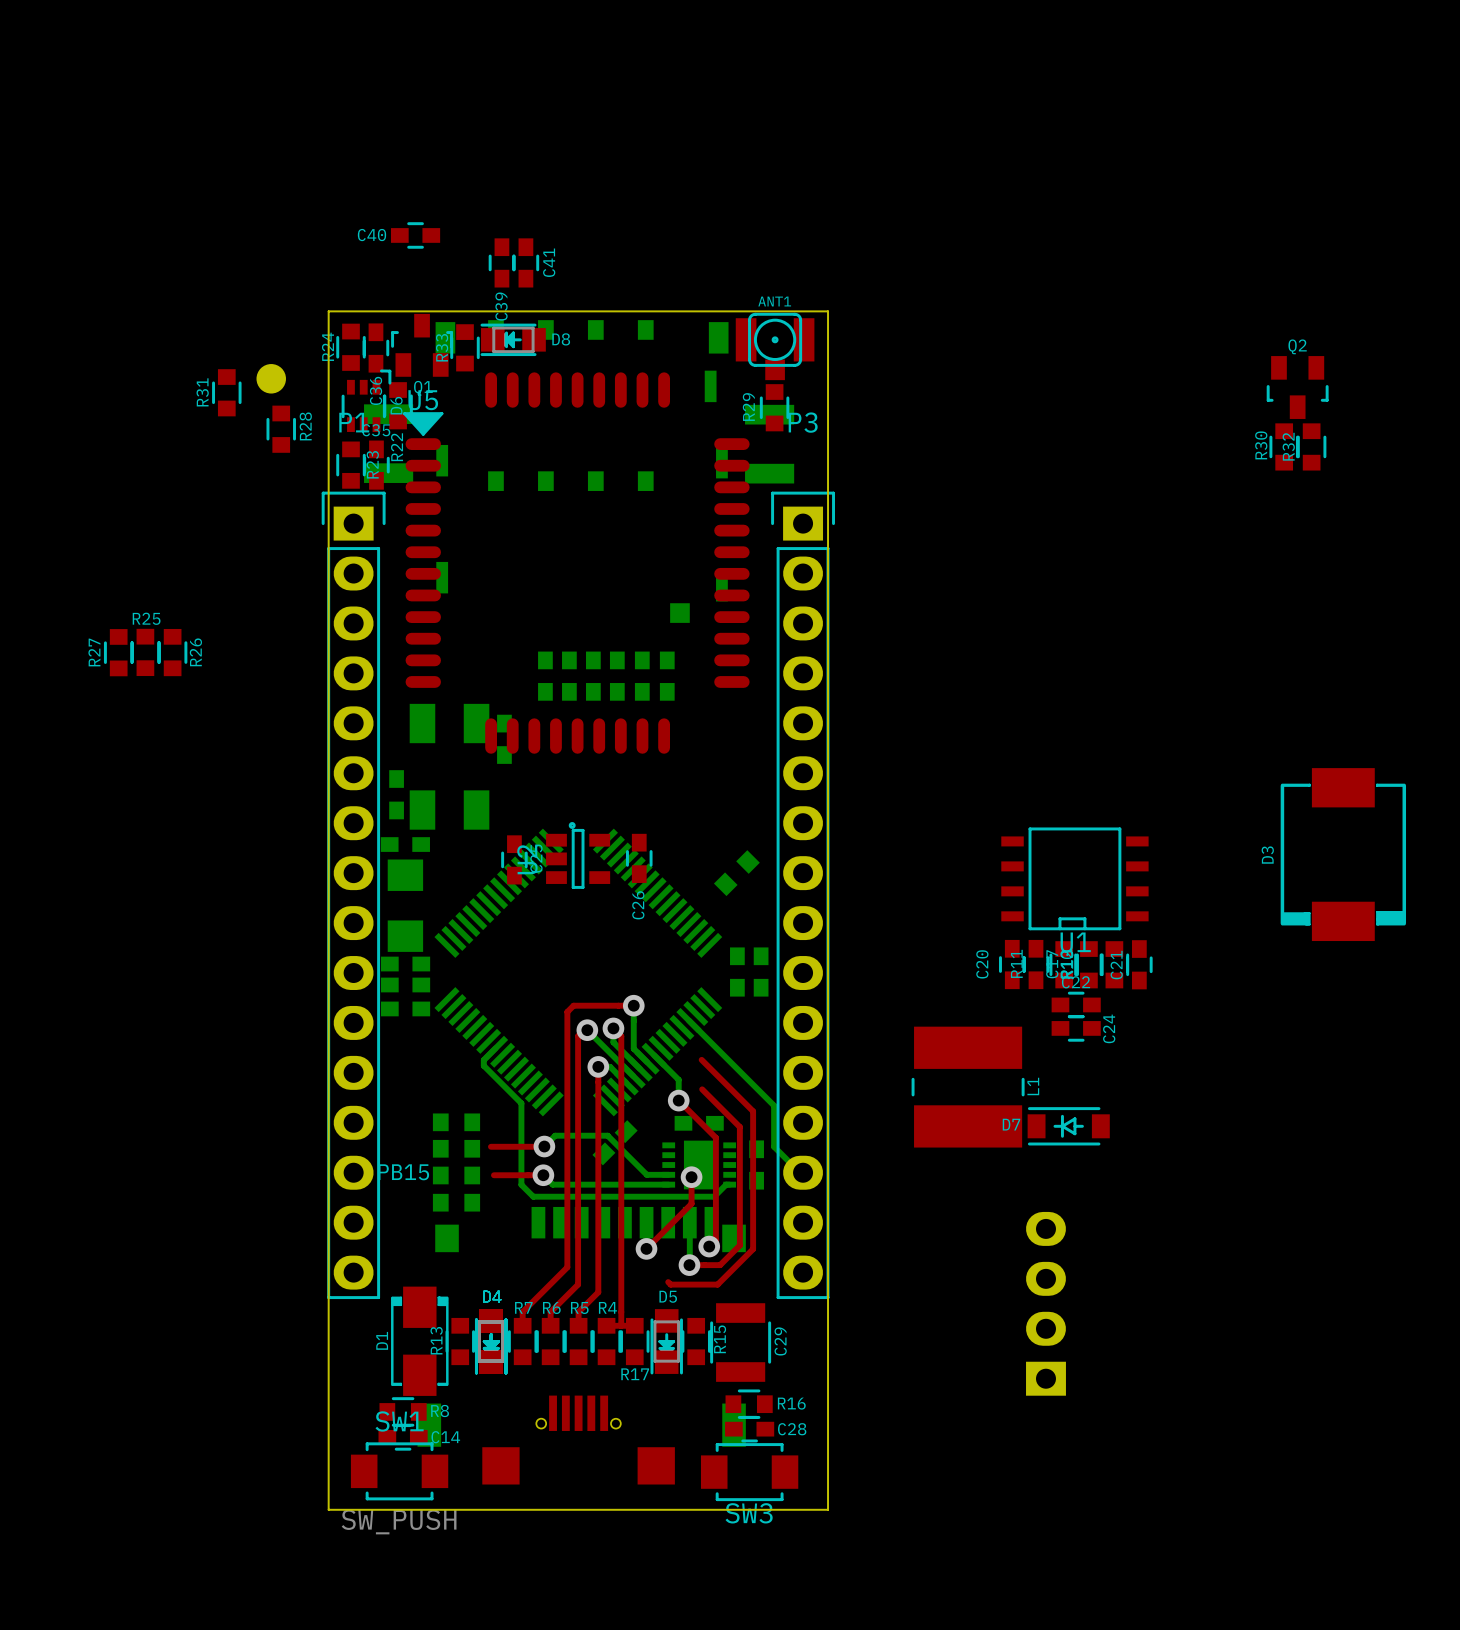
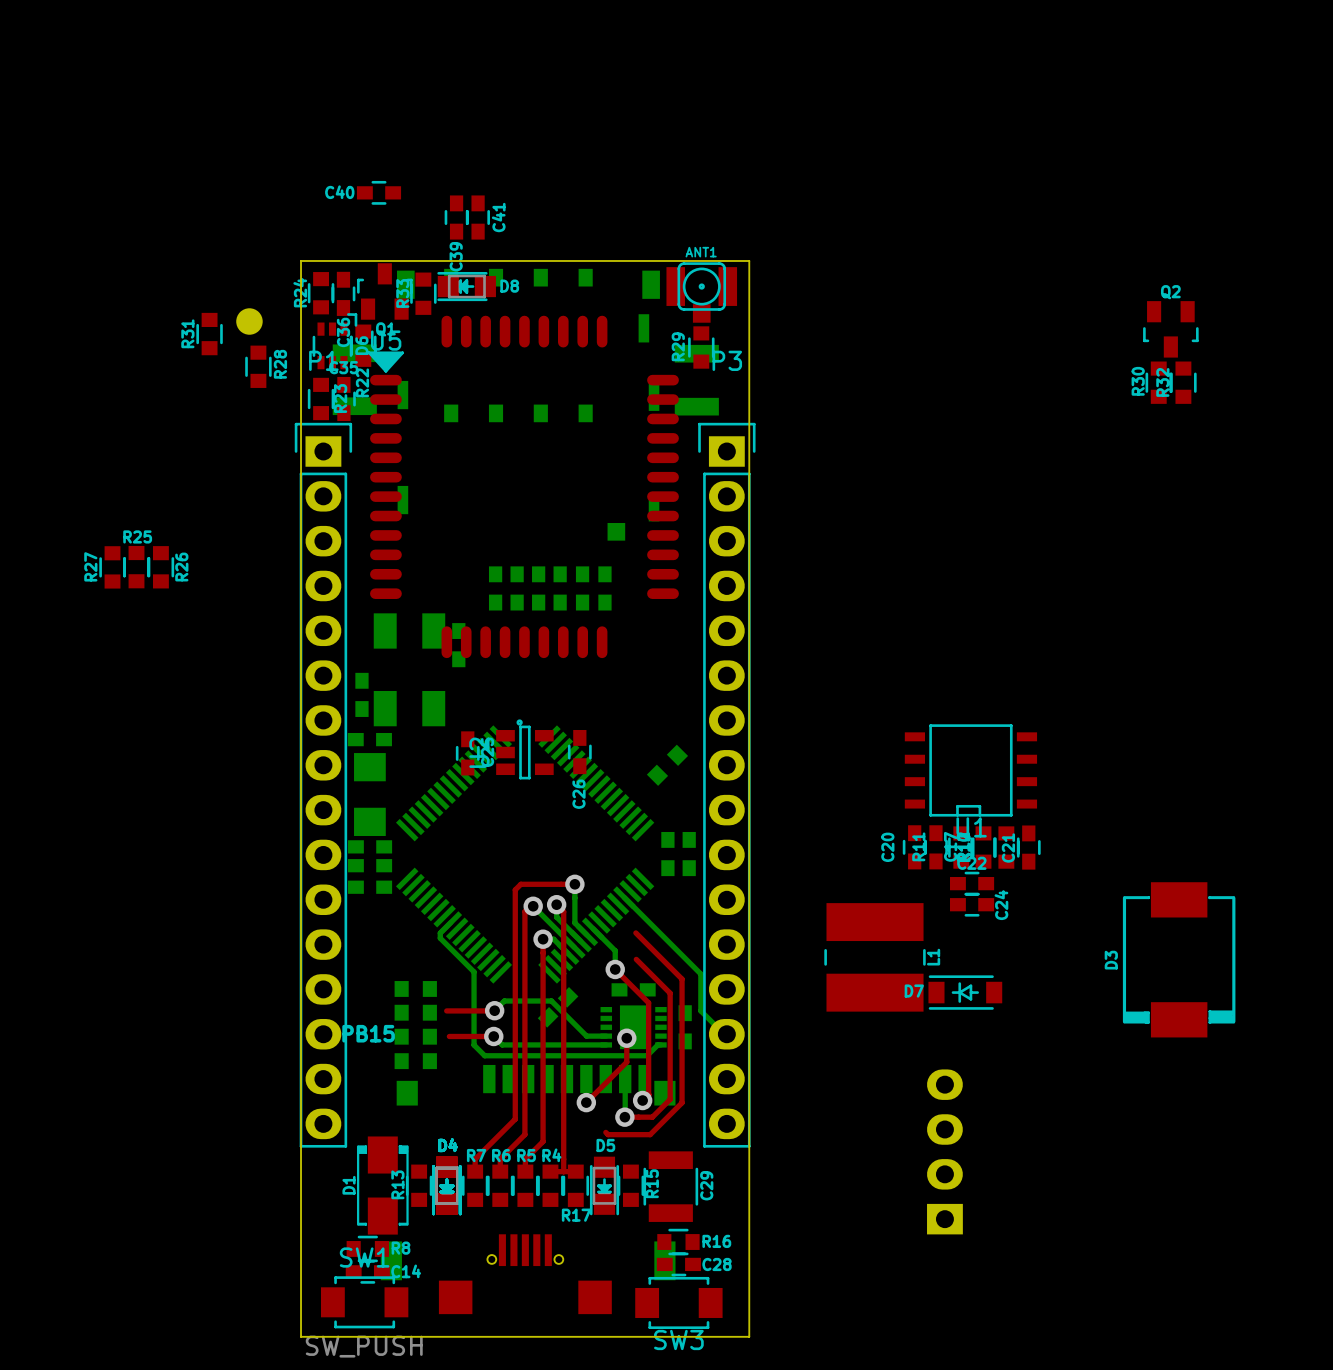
D3 position: (1343, 854) -> (1179, 959)

